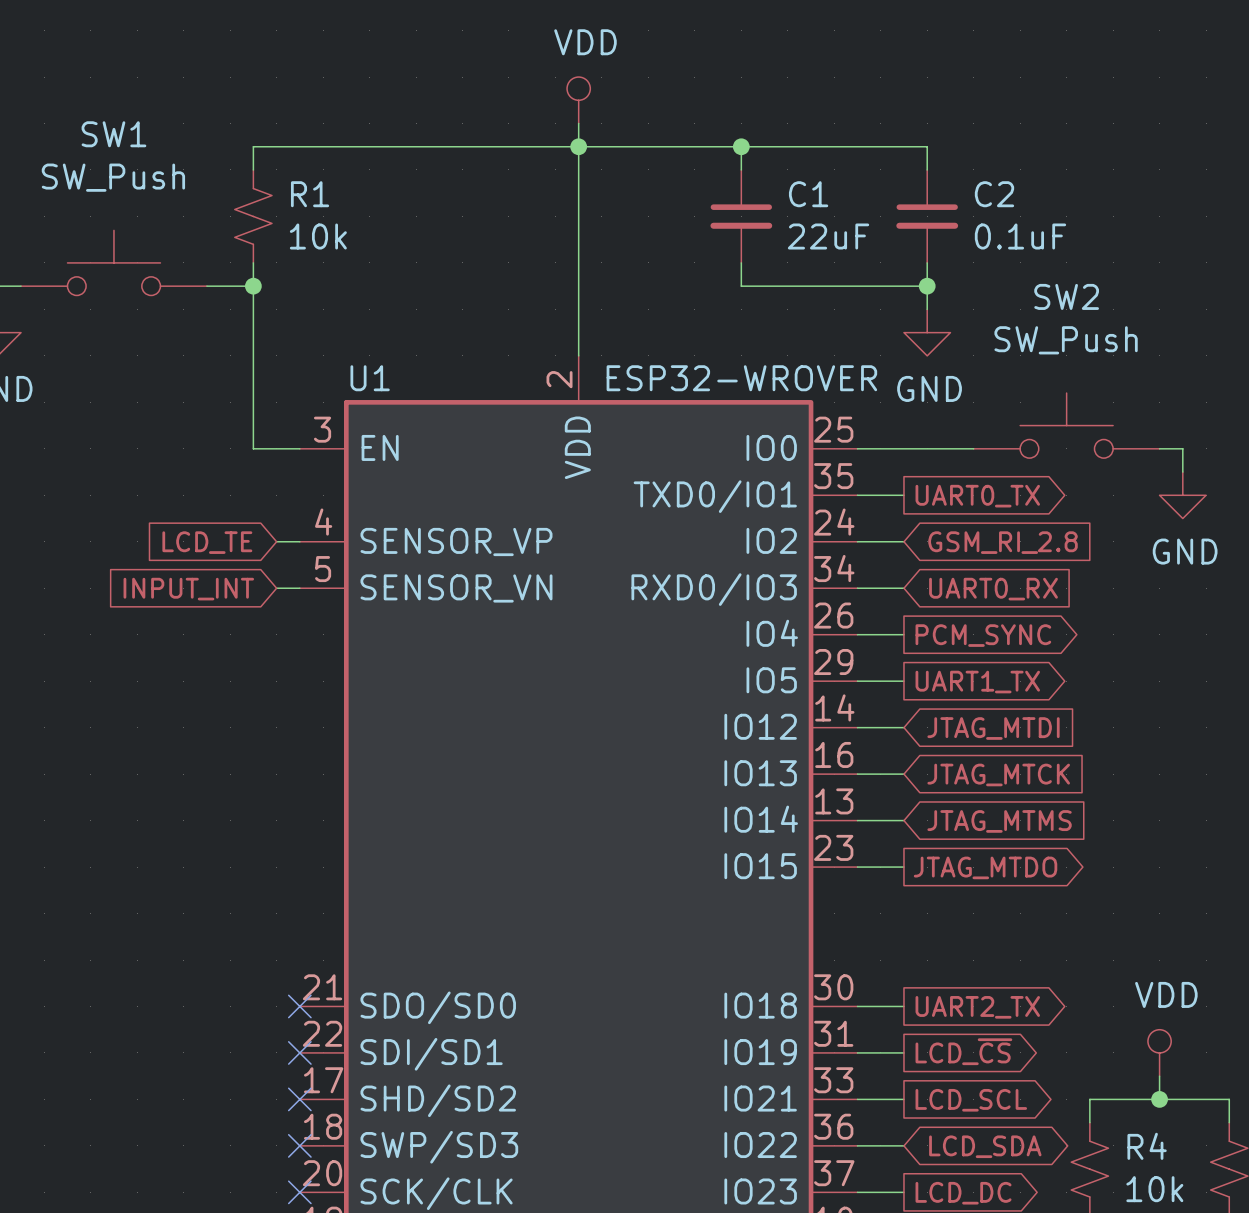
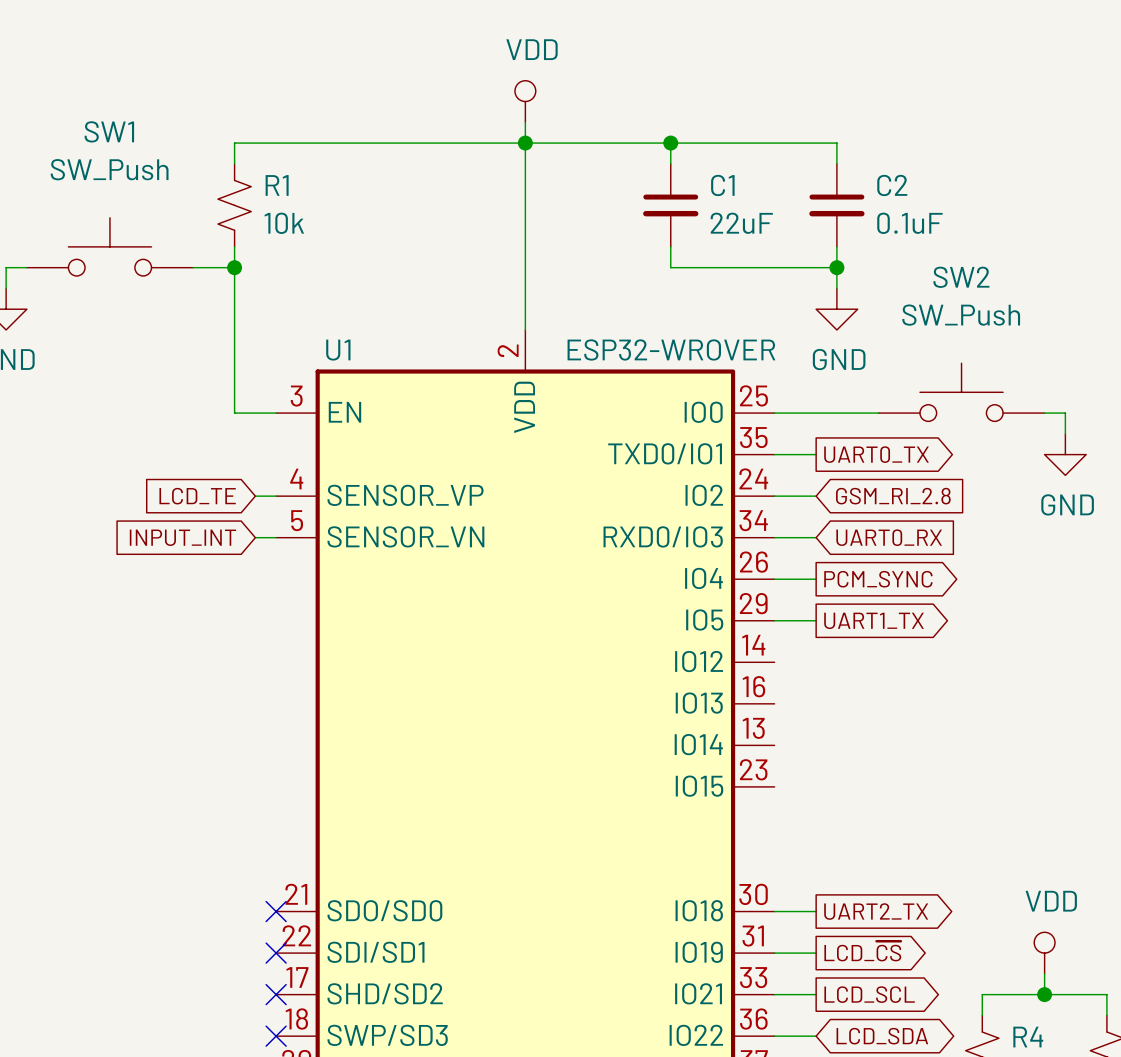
wire: (857, 727) (903, 727) -> none
global label: JTAG_MTDI (993, 728) -> none
wire: (857, 774) (903, 774) -> none
global label: JTAG_MTCK (998, 774) -> none
wire: (857, 820) (903, 820) -> none
global label: JTAG_MTMS (999, 821) -> none
wire: (857, 867) (903, 867) -> none
global label: JTAG_MTDO (985, 867) -> none

